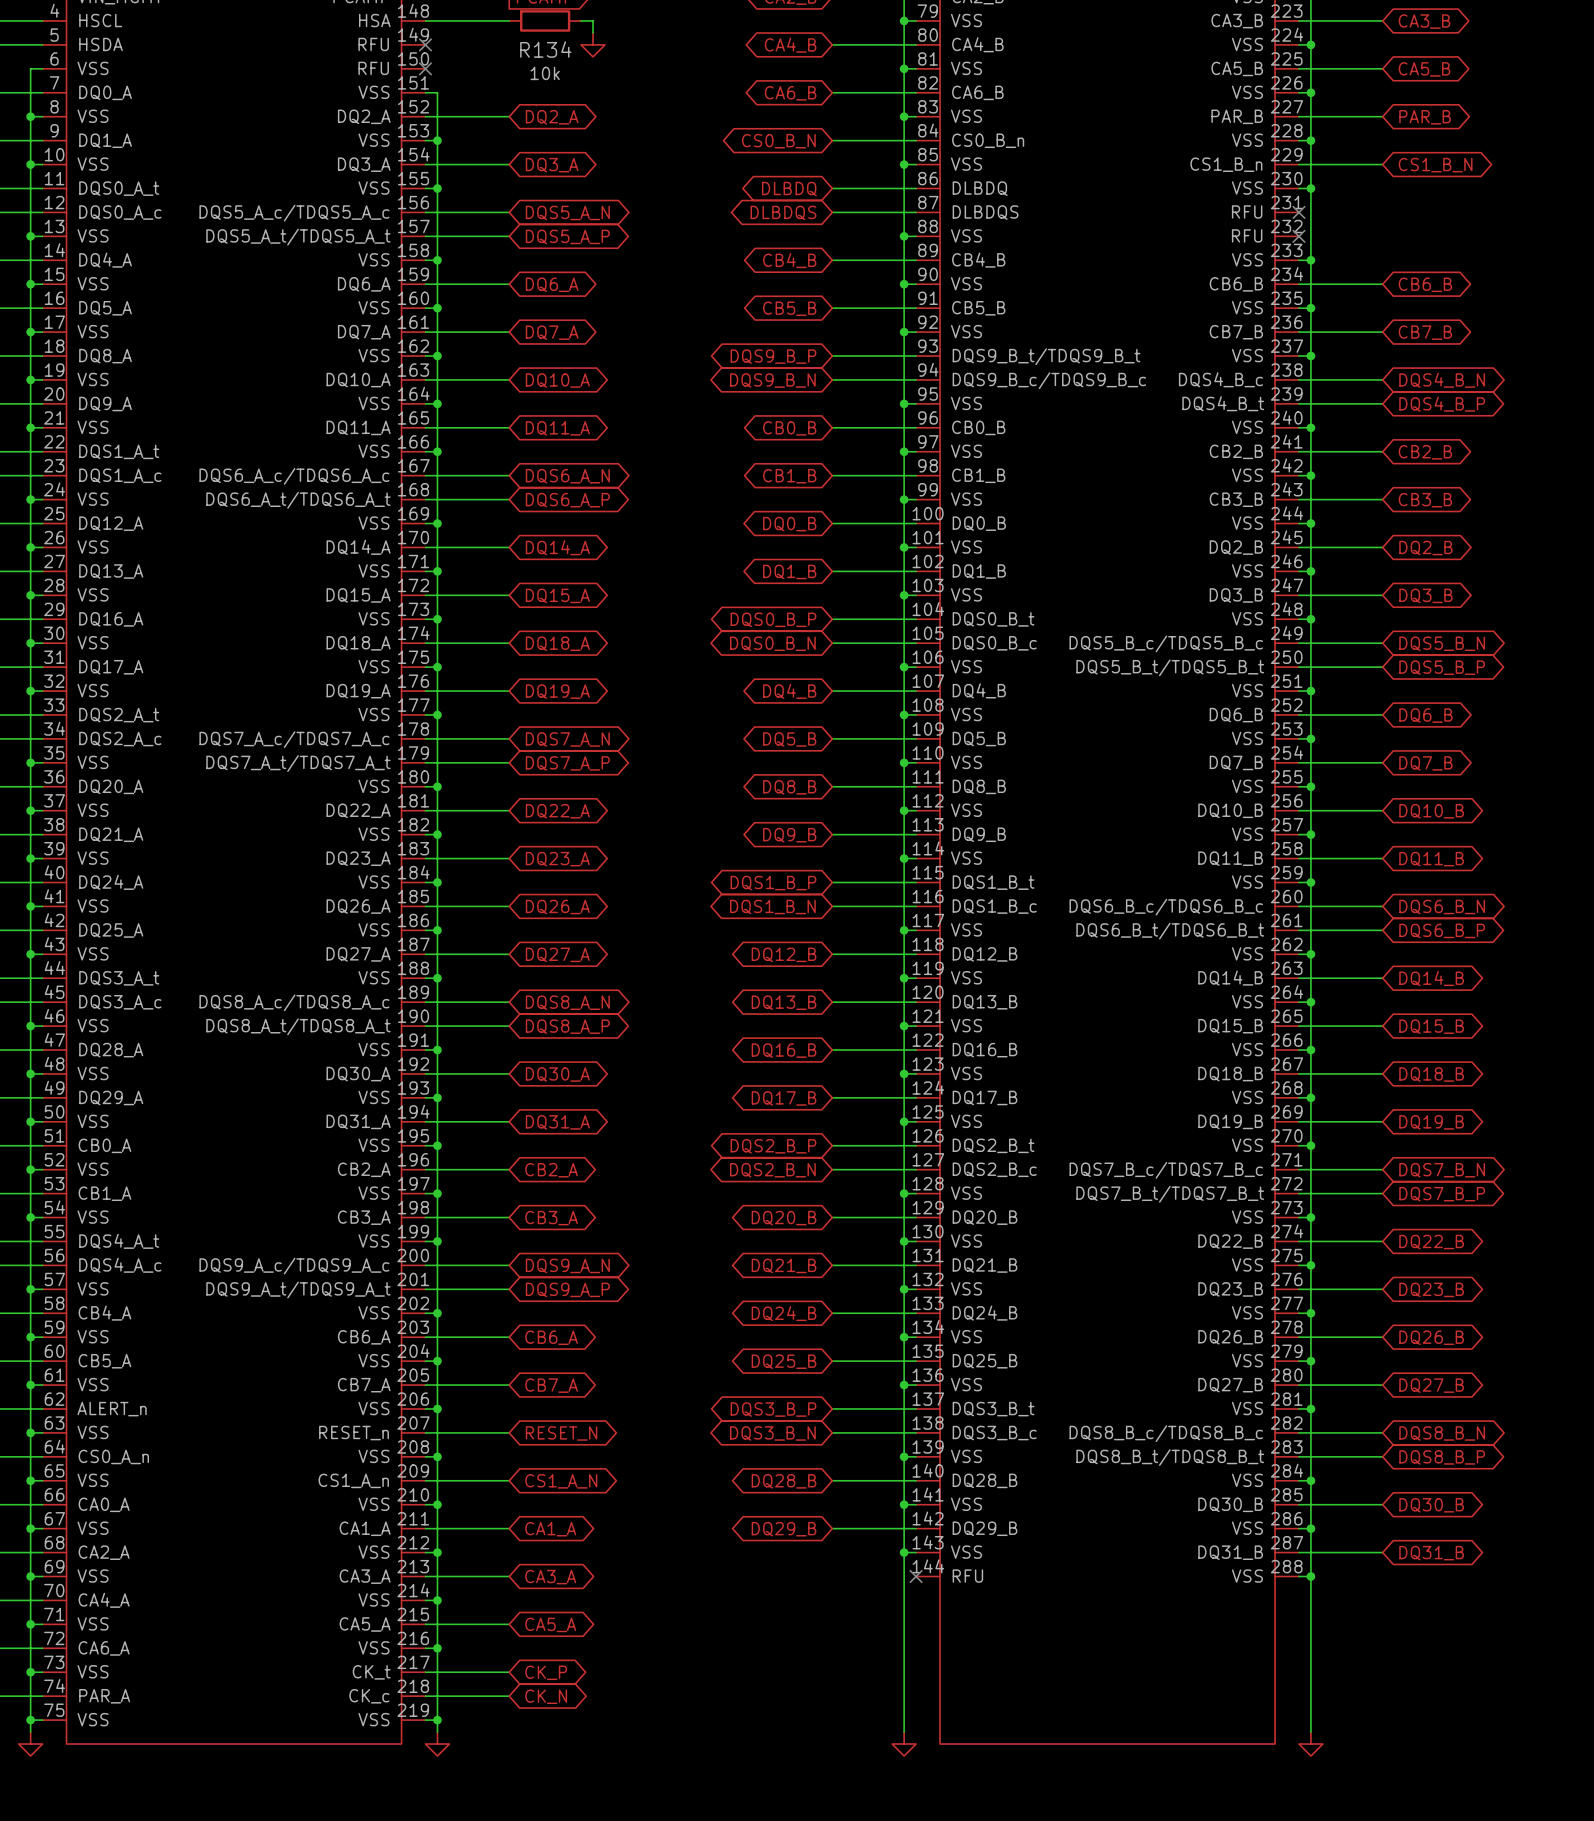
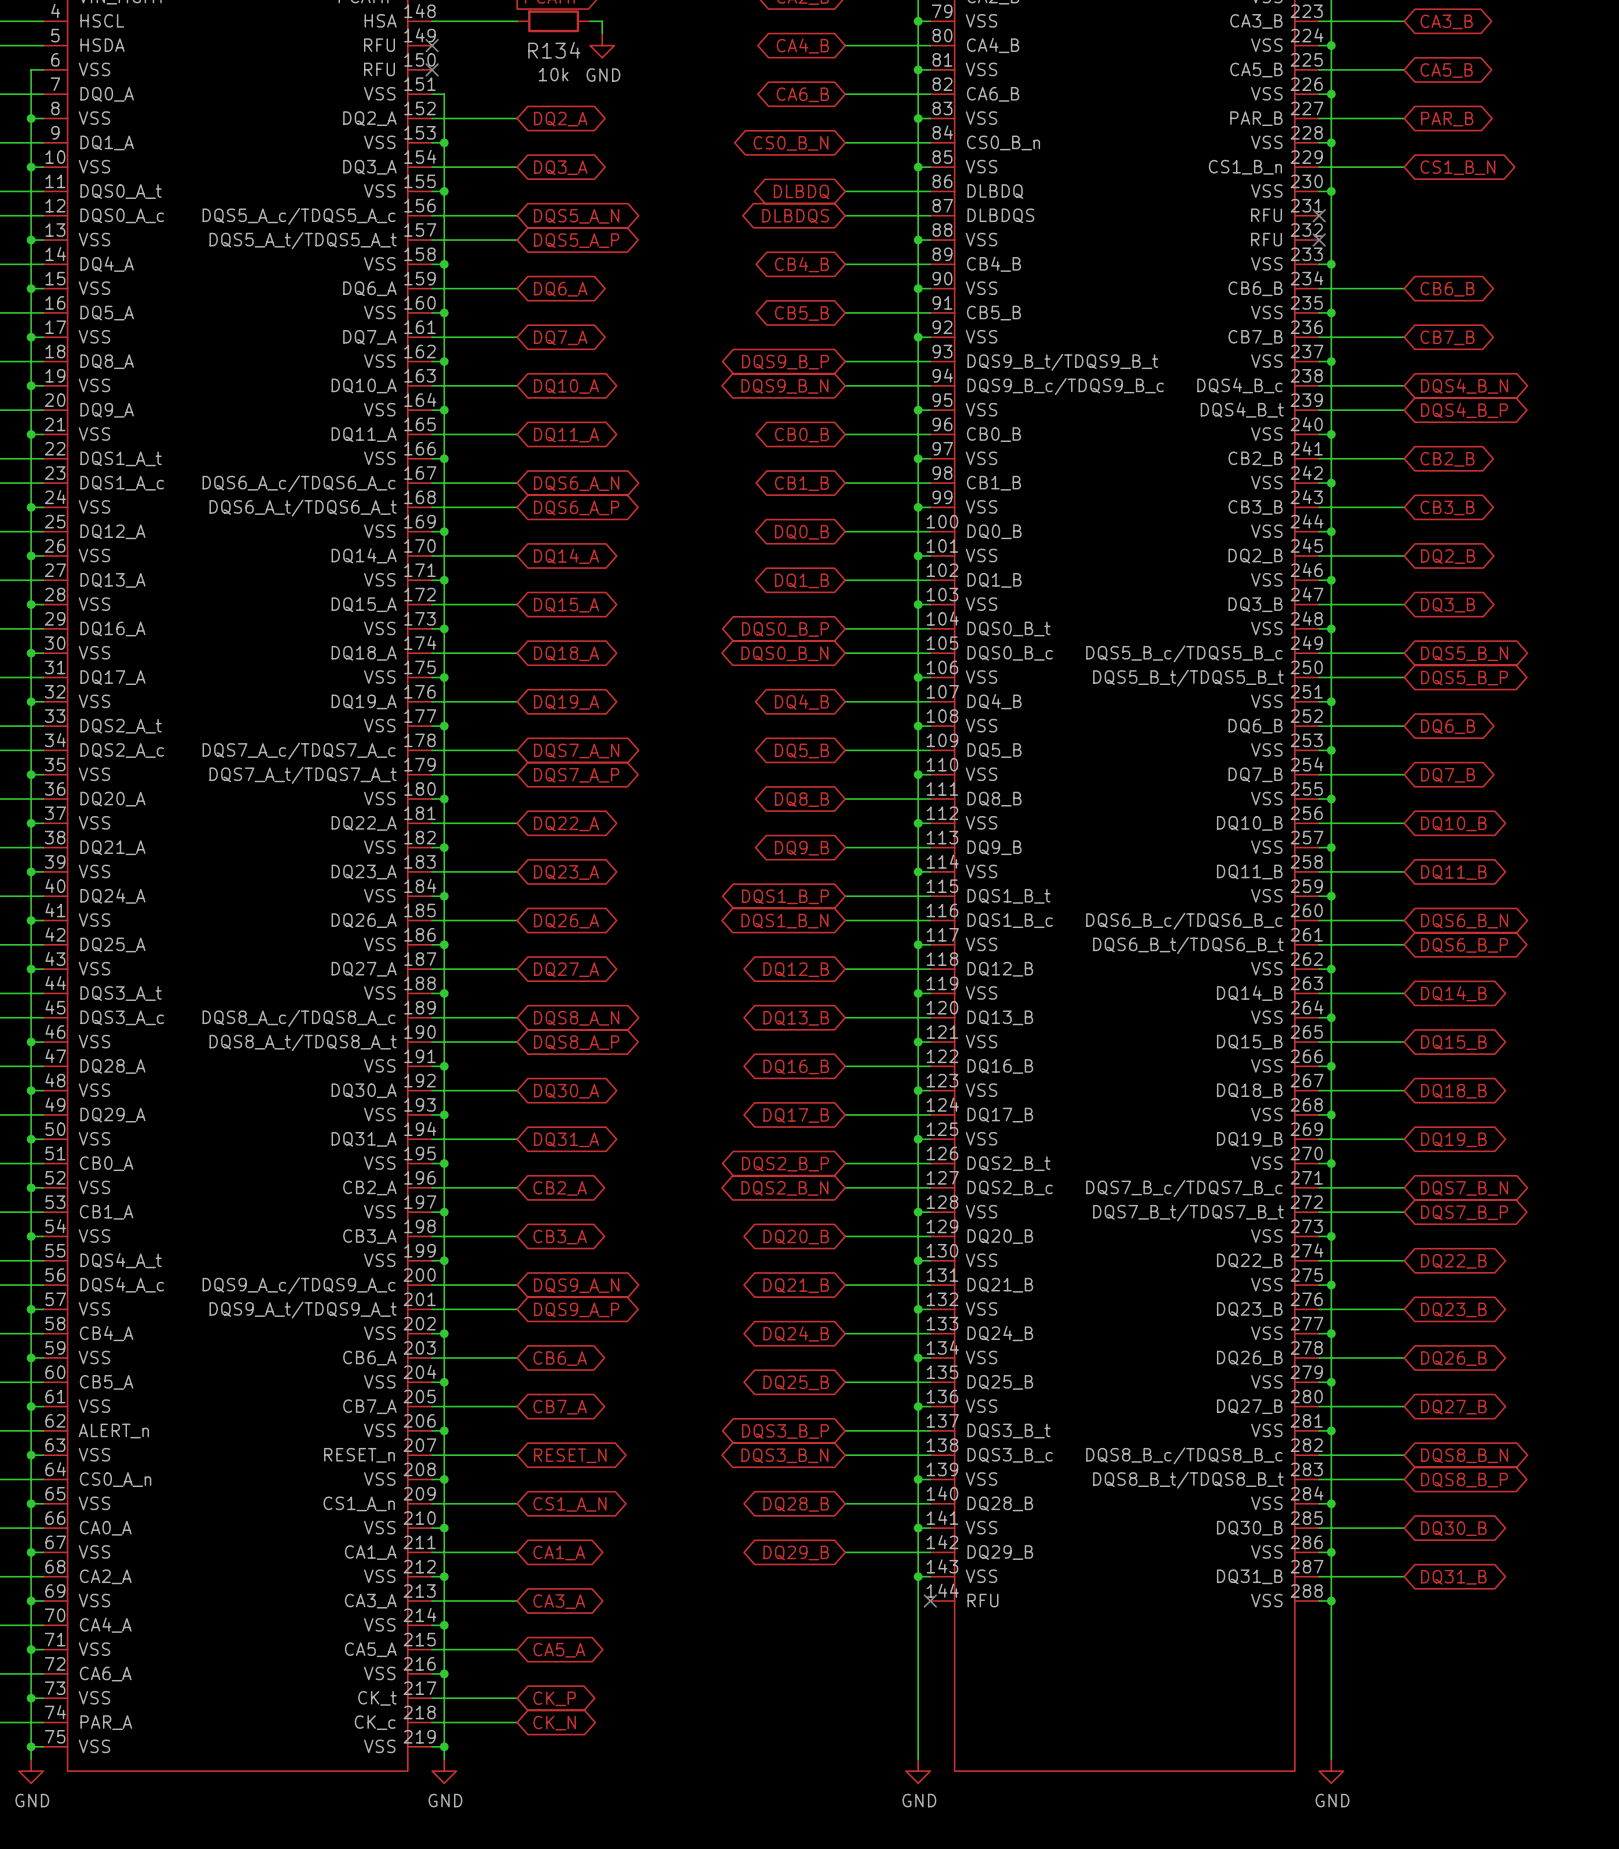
power symbol text: none -> GND (603, 75)
power symbol text: none -> GND (32, 1800)
power symbol text: none -> GND (445, 1800)
power symbol text: none -> GND (919, 1800)
power symbol text: none -> GND (1332, 1800)

